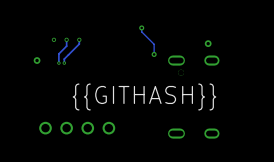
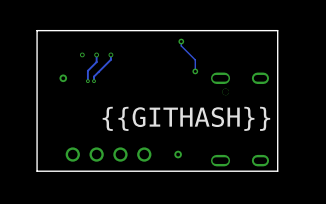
board edge: none -> (277, 30) (277, 171) (37, 171) (37, 30) (277, 30)
via: (208, 43) -> none
via: none -> (178, 154)

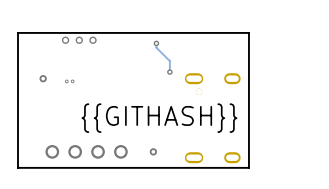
via: none -> (65, 40)
via: none -> (79, 40)
via: none -> (93, 40)
via: (82, 54) -> none
track: (96, 54) (96, 62) (87, 70) (87, 81) -> none
via: (96, 54) -> none
track: (110, 54) (110, 59) (94, 76) (94, 81) -> none
via: (110, 54) -> none

